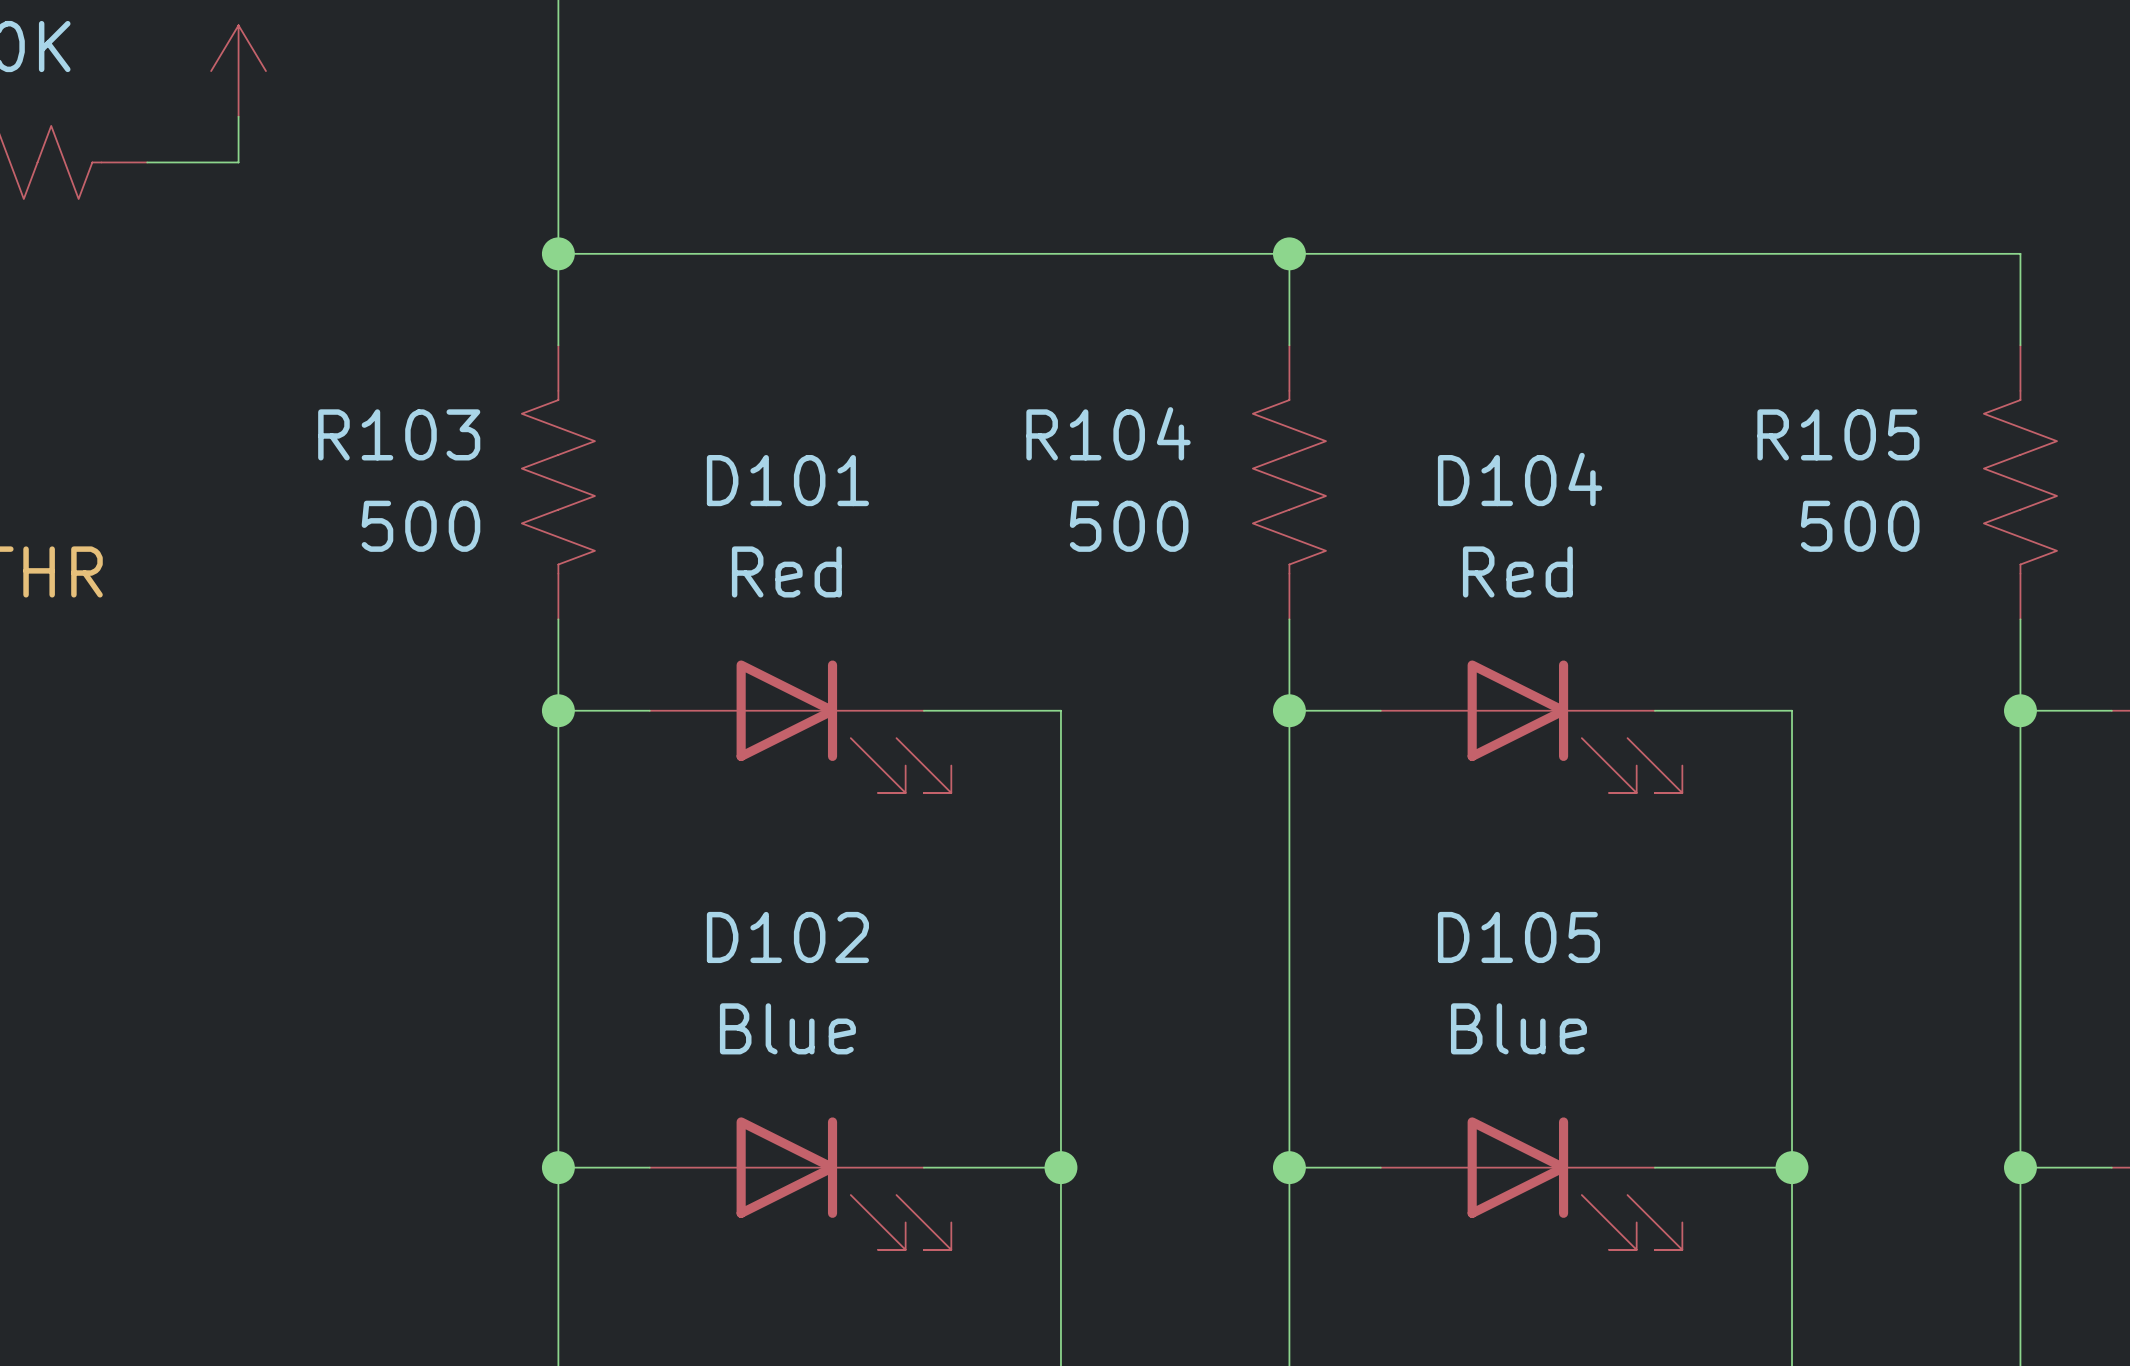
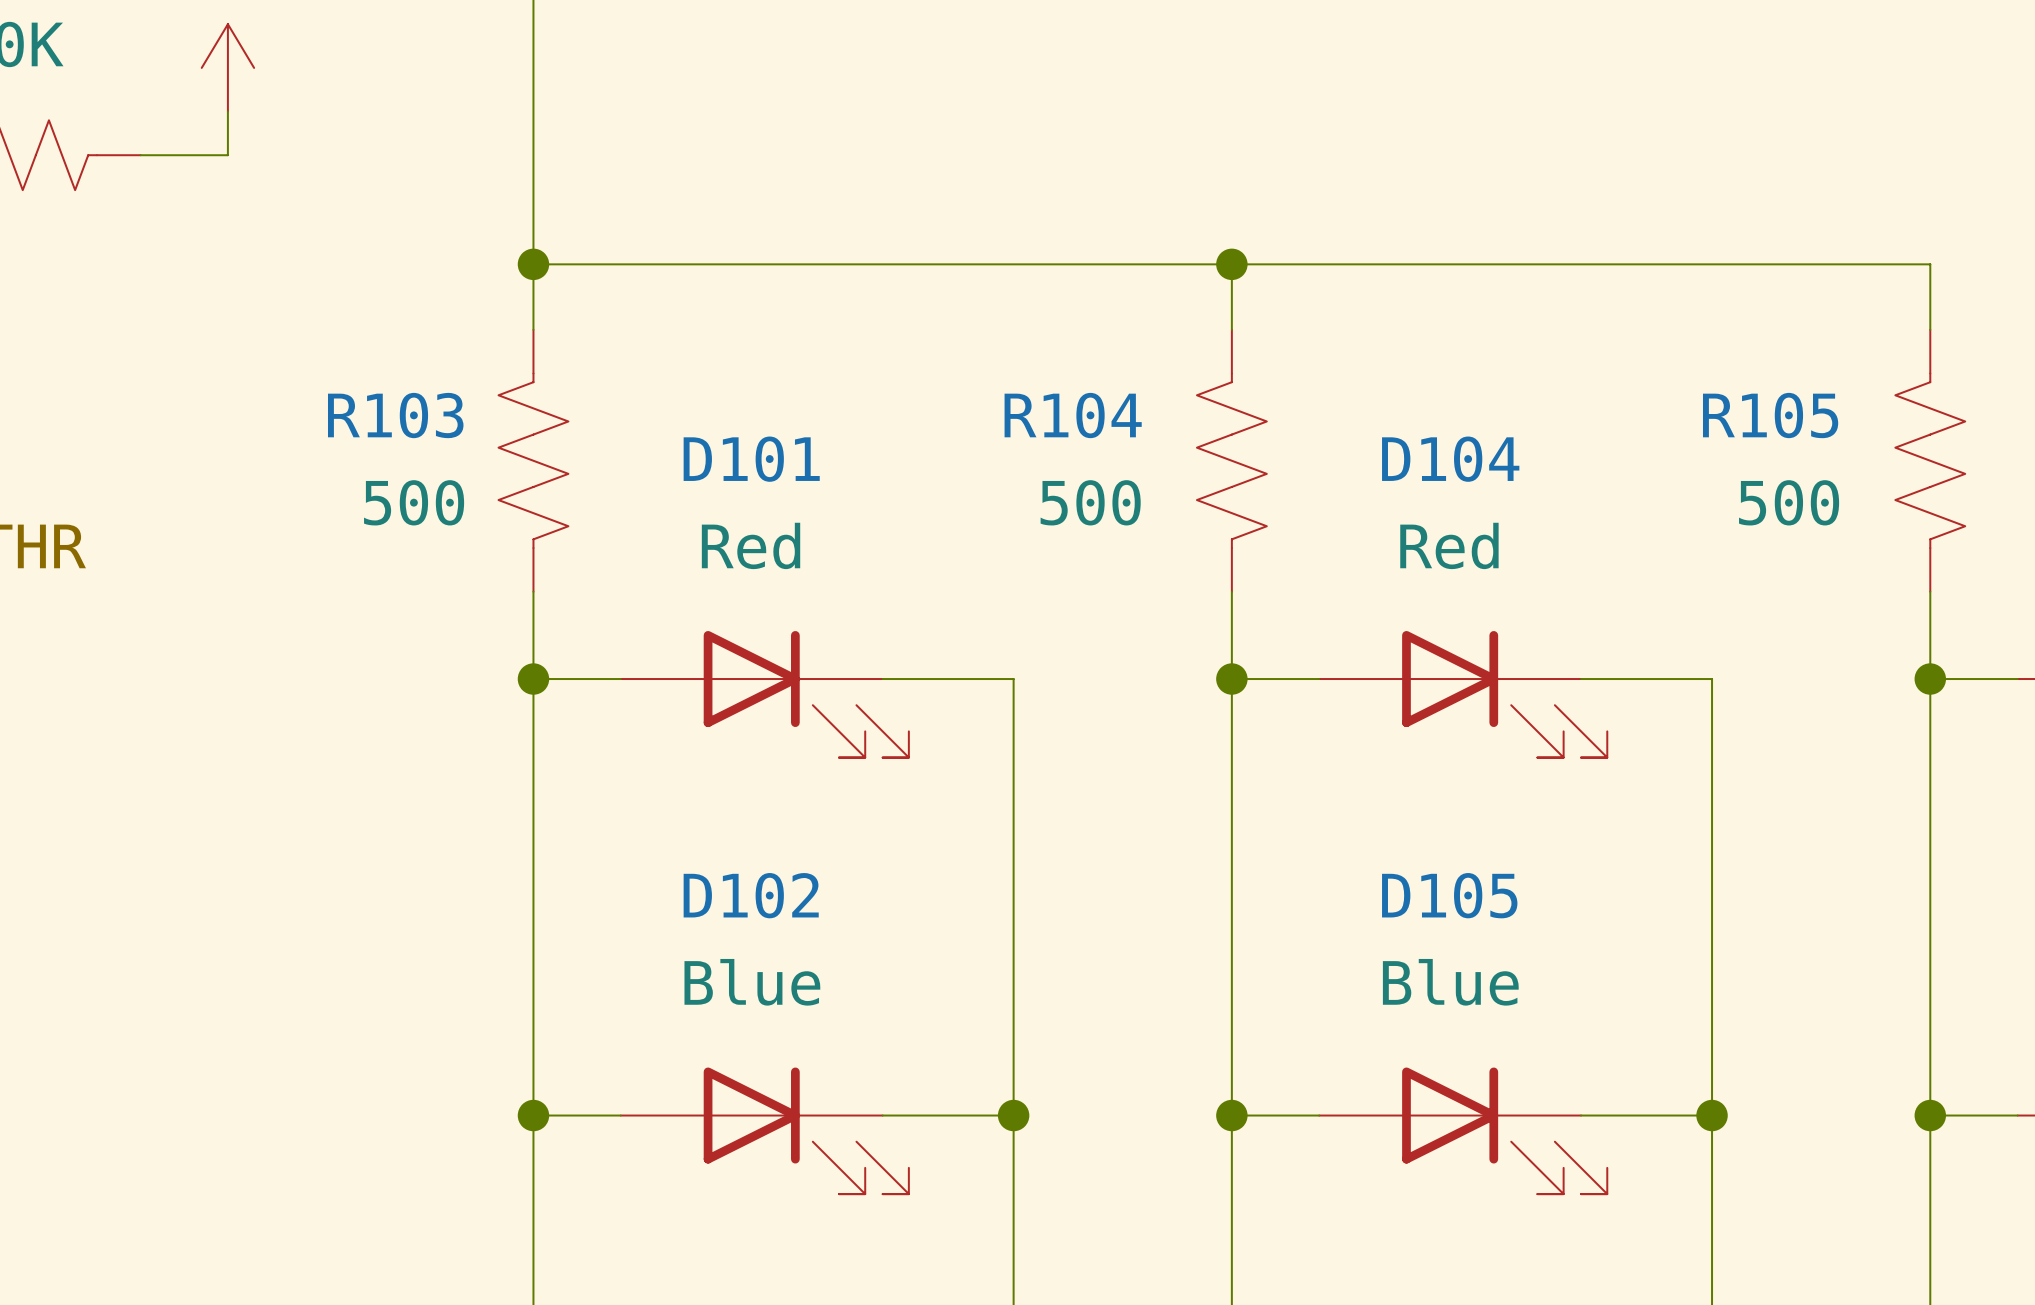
wire: (558, 253) (2020, 253) (2020, 276) -> (533, 264) (1930, 264)
junction position: (558, 253) -> (533, 264)
junction position: (1289, 253) -> (1231, 264)

